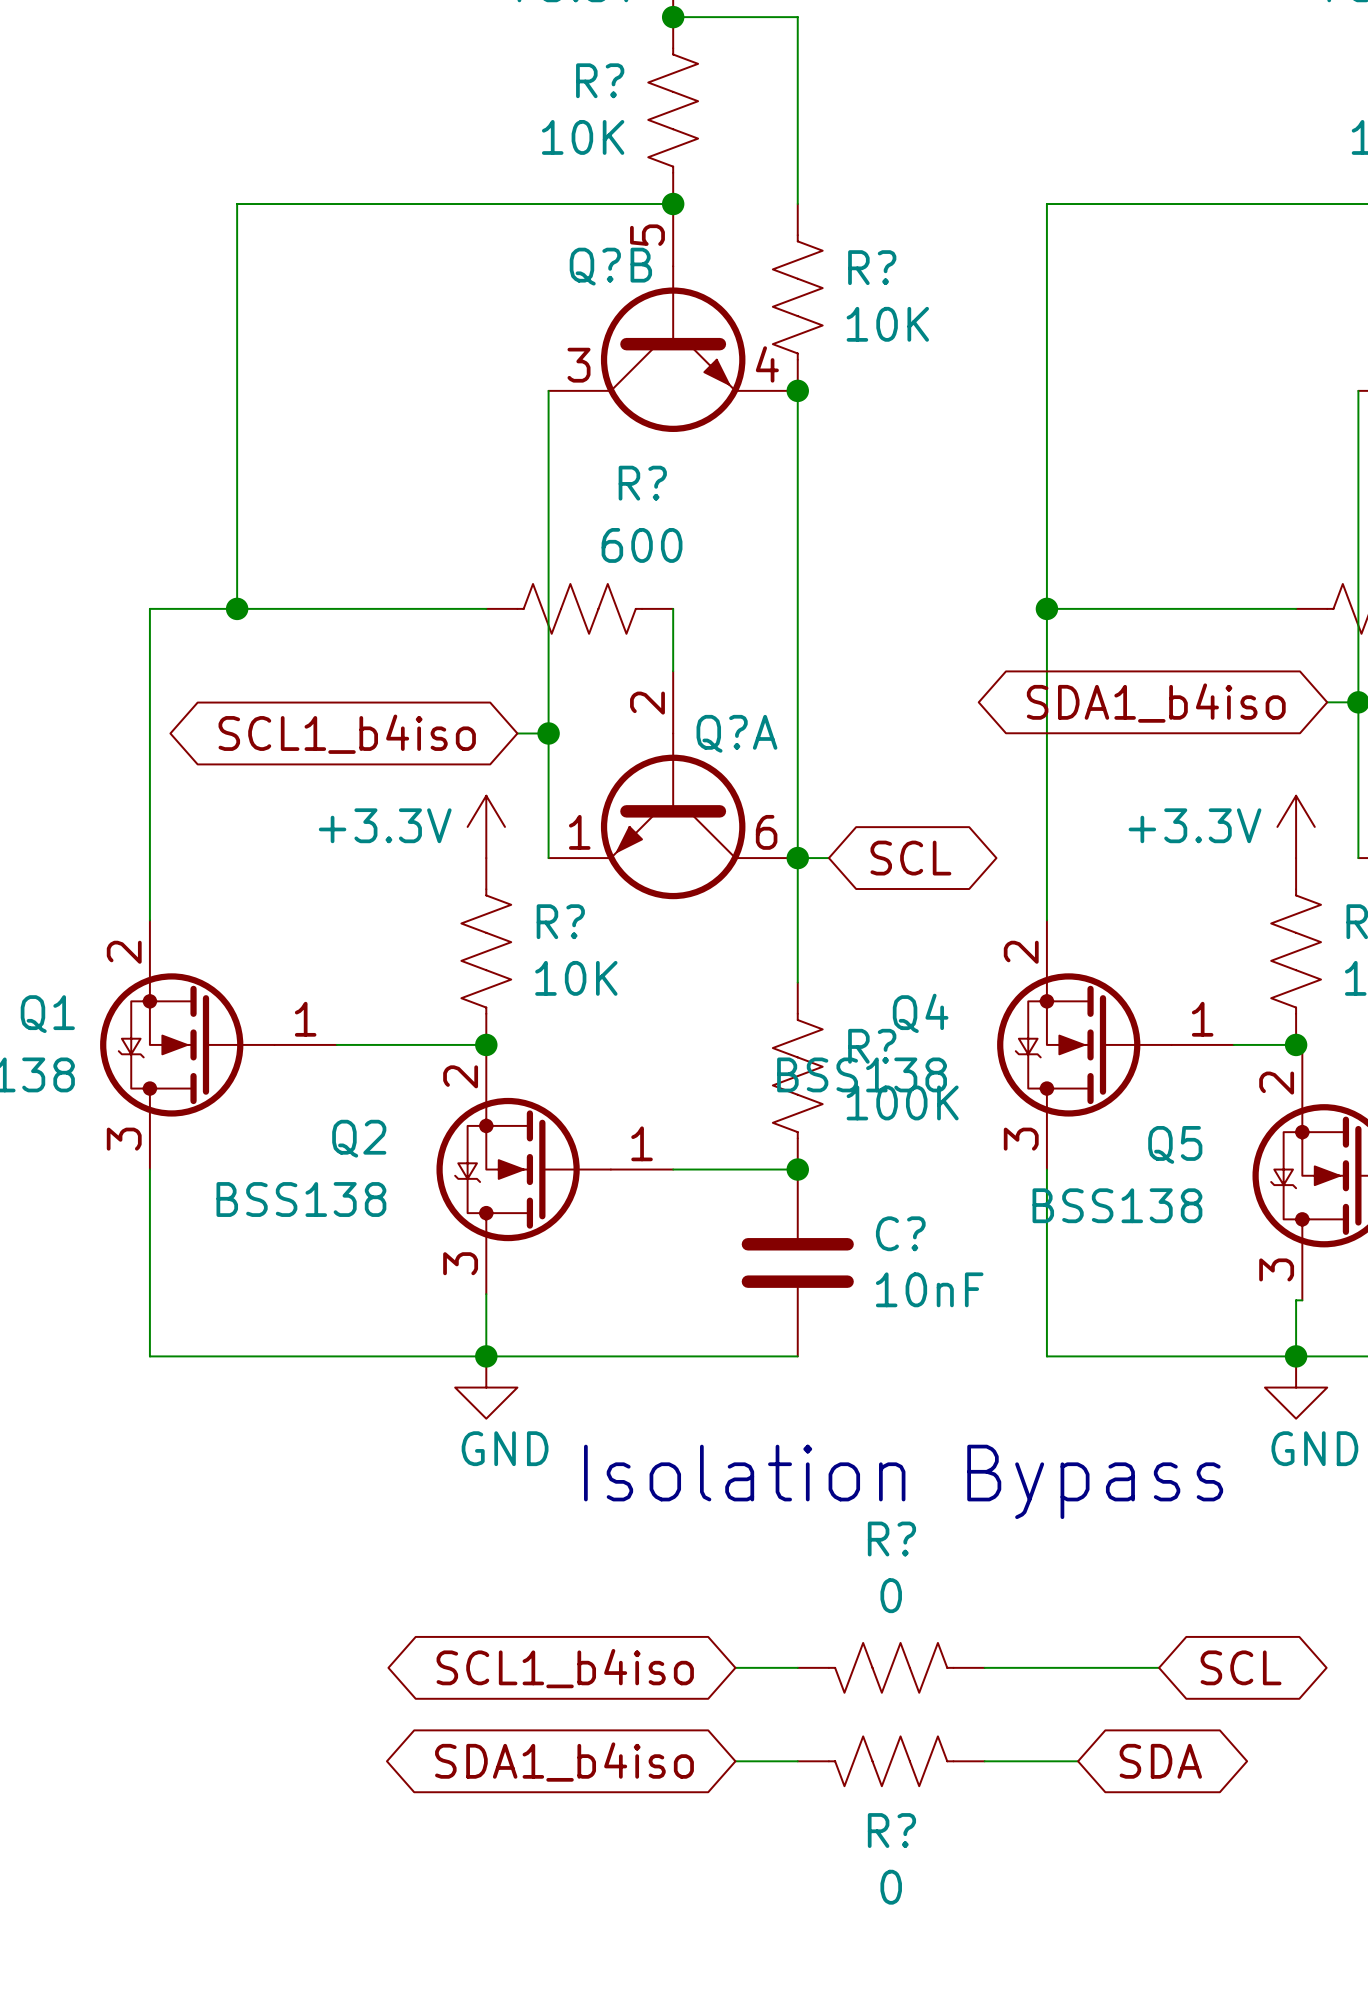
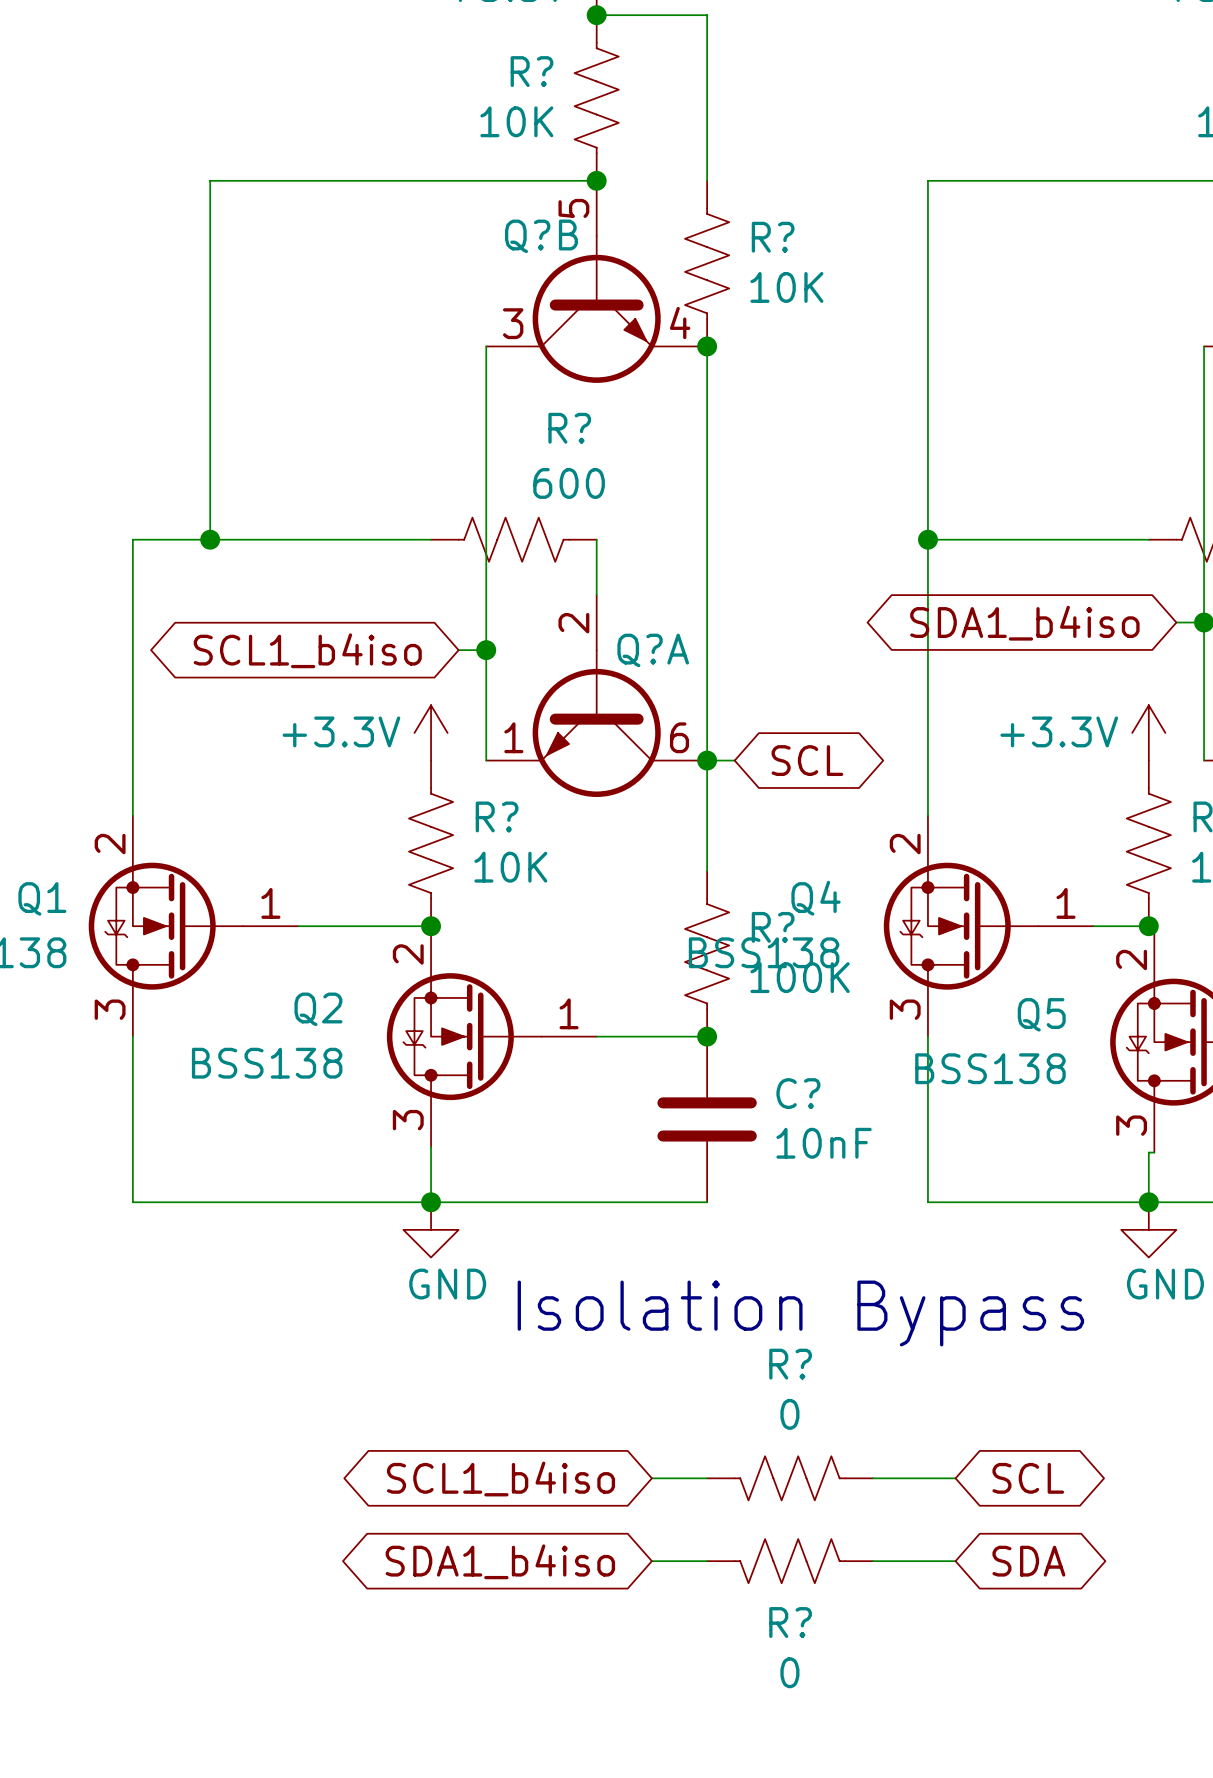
wire: (1078, 1667) (1159, 1667) -> none
global label position: SCL (1241, 1667) -> SCL (1028, 1478)

